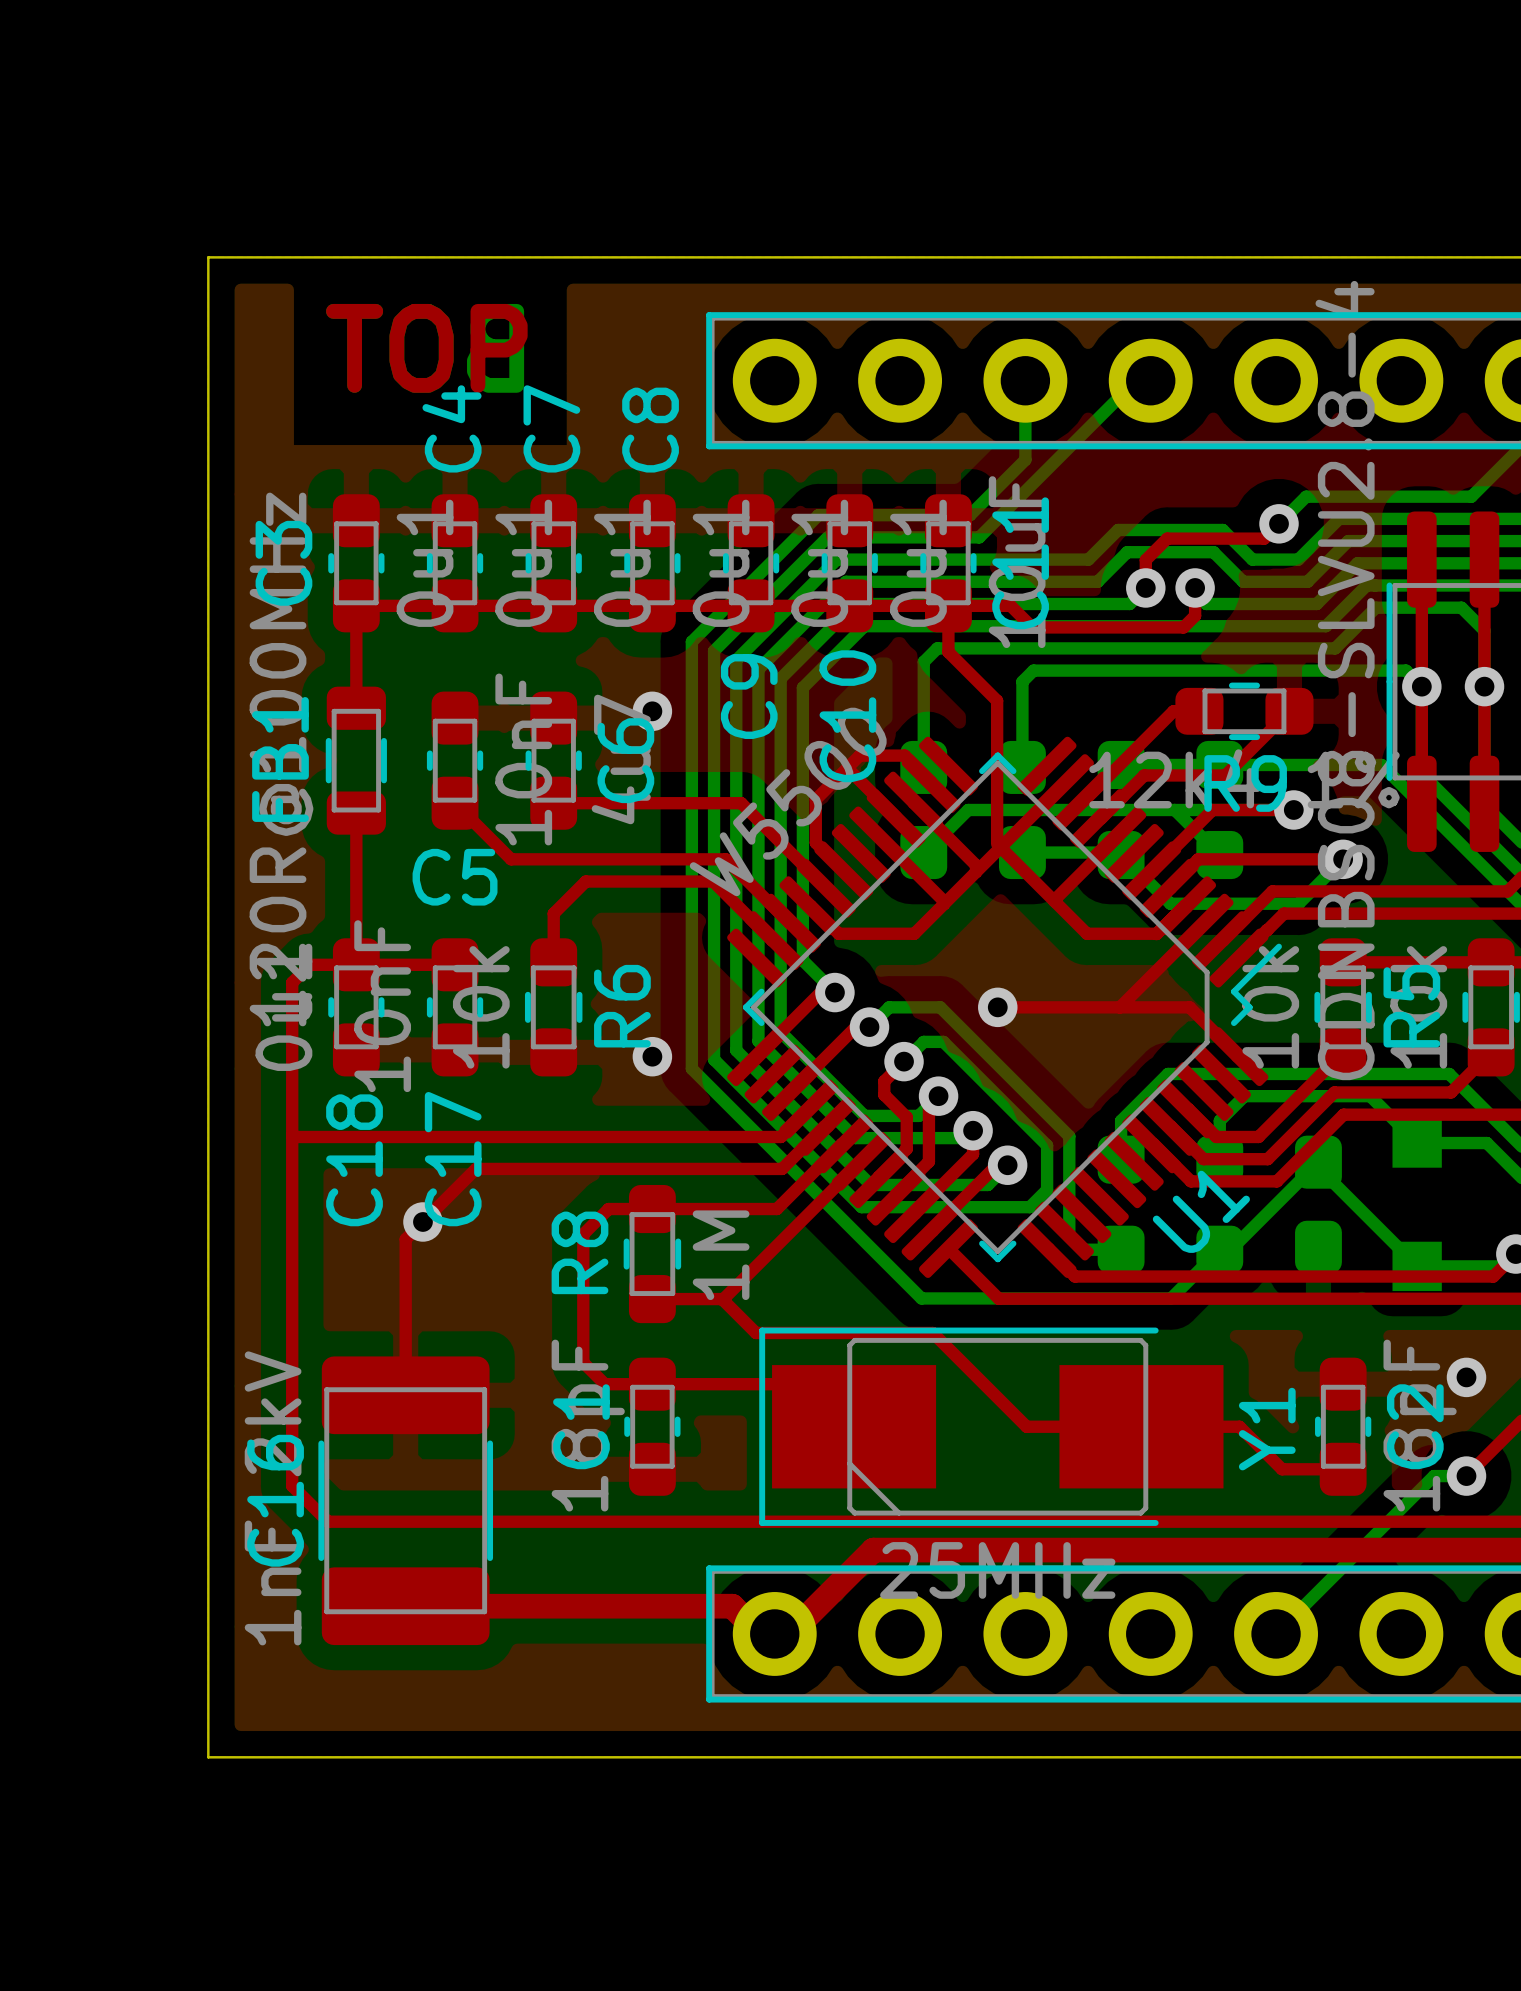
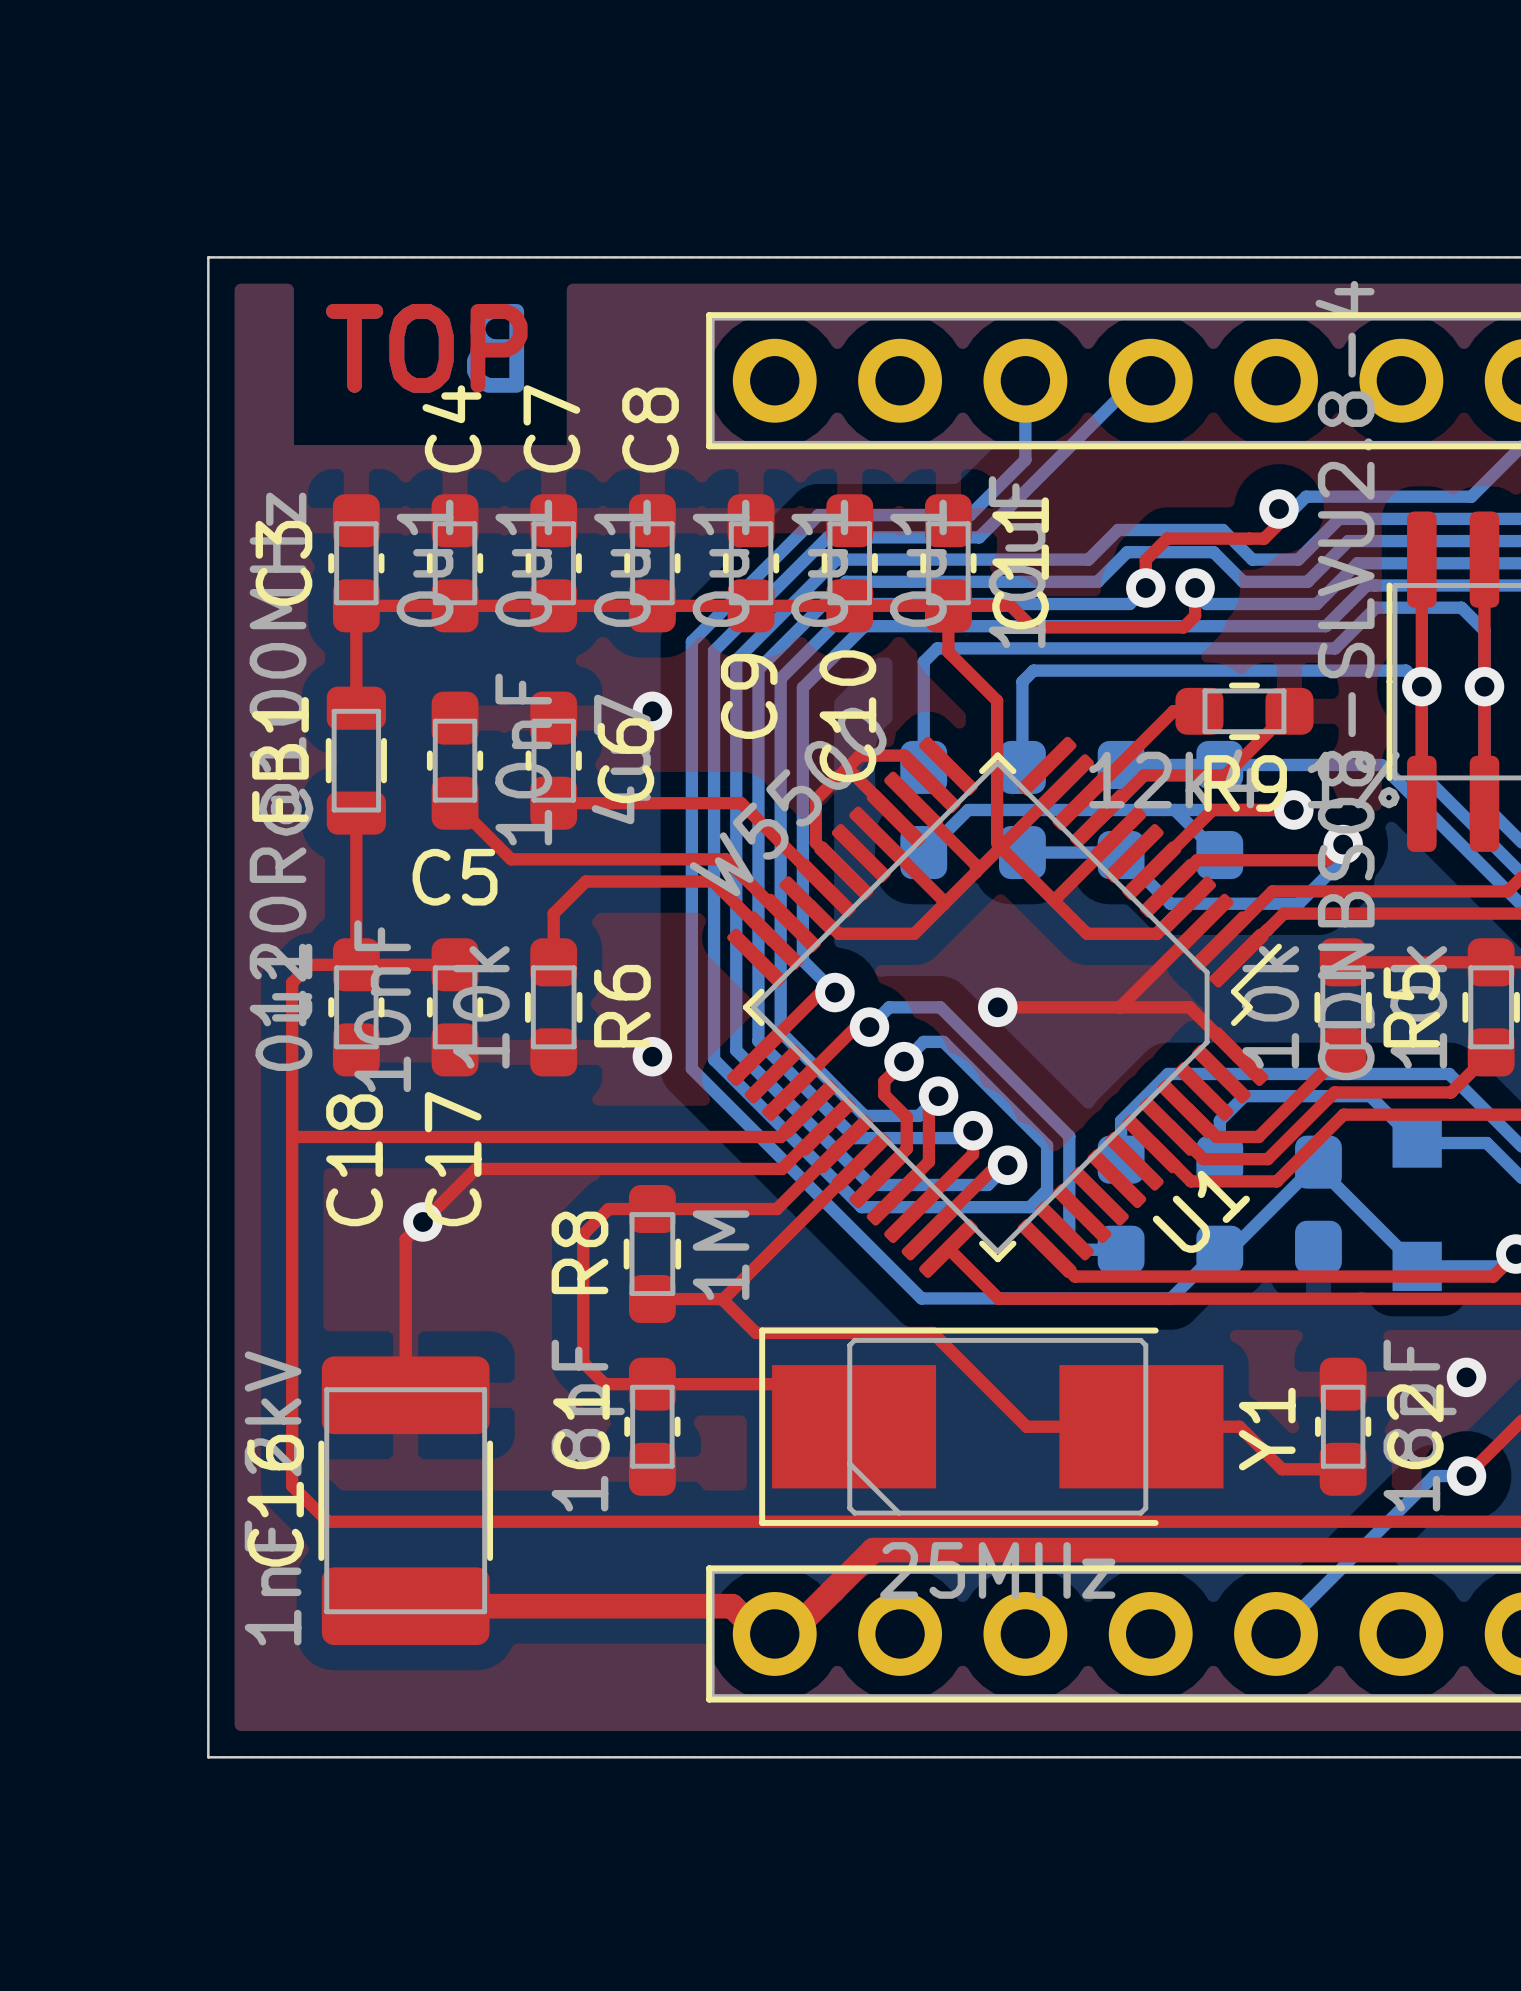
via position: (1279, 523) -> (1279, 509)
top track: (1343, 859) (1197, 860) -> (1343, 844) (1327, 860) (1197, 860)
via position: (1343, 859) -> (1343, 844)

